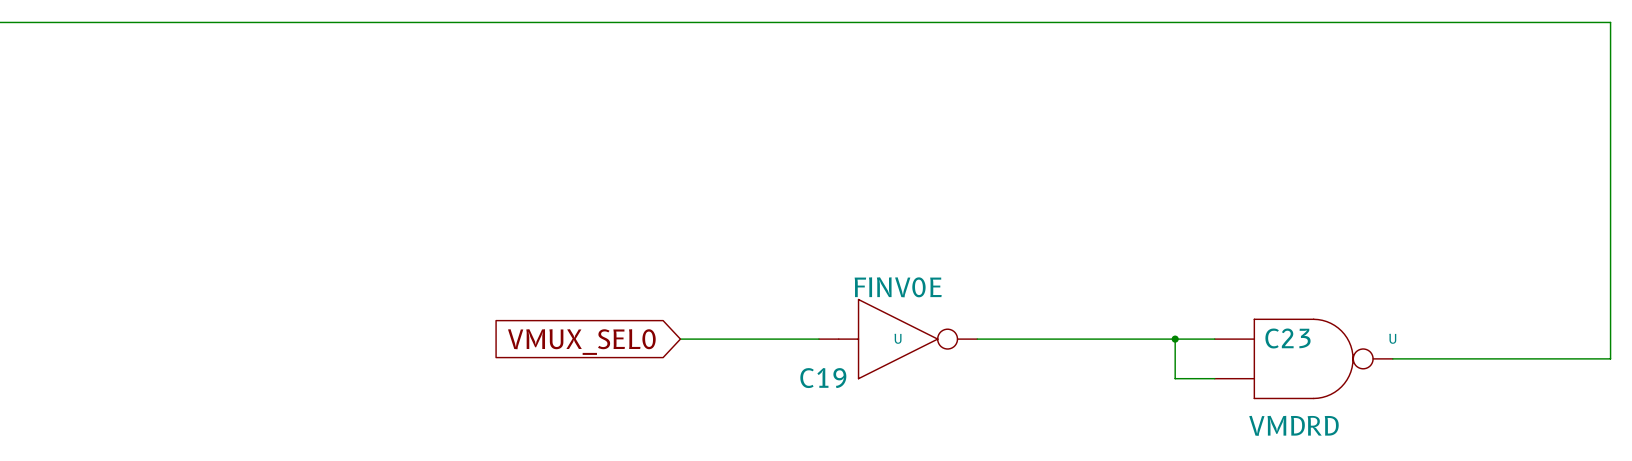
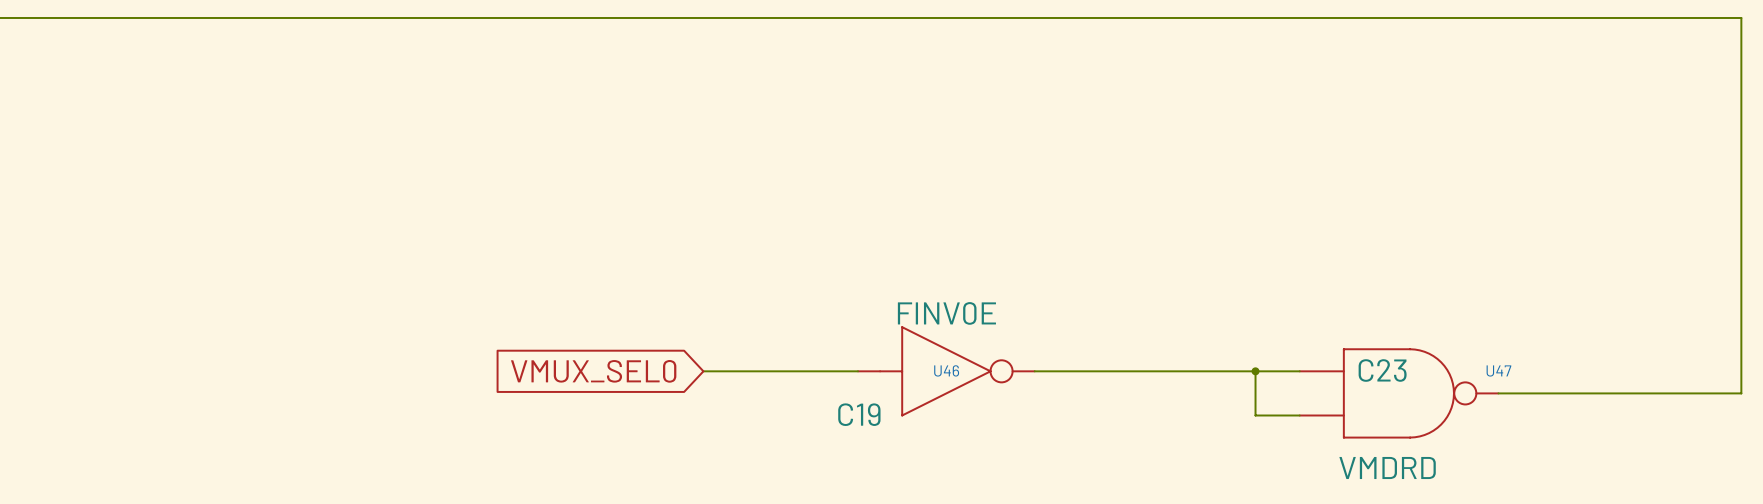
U name: U (898, 338) -> U46 (946, 370)
U name: U (1392, 338) -> U47 (1498, 370)

